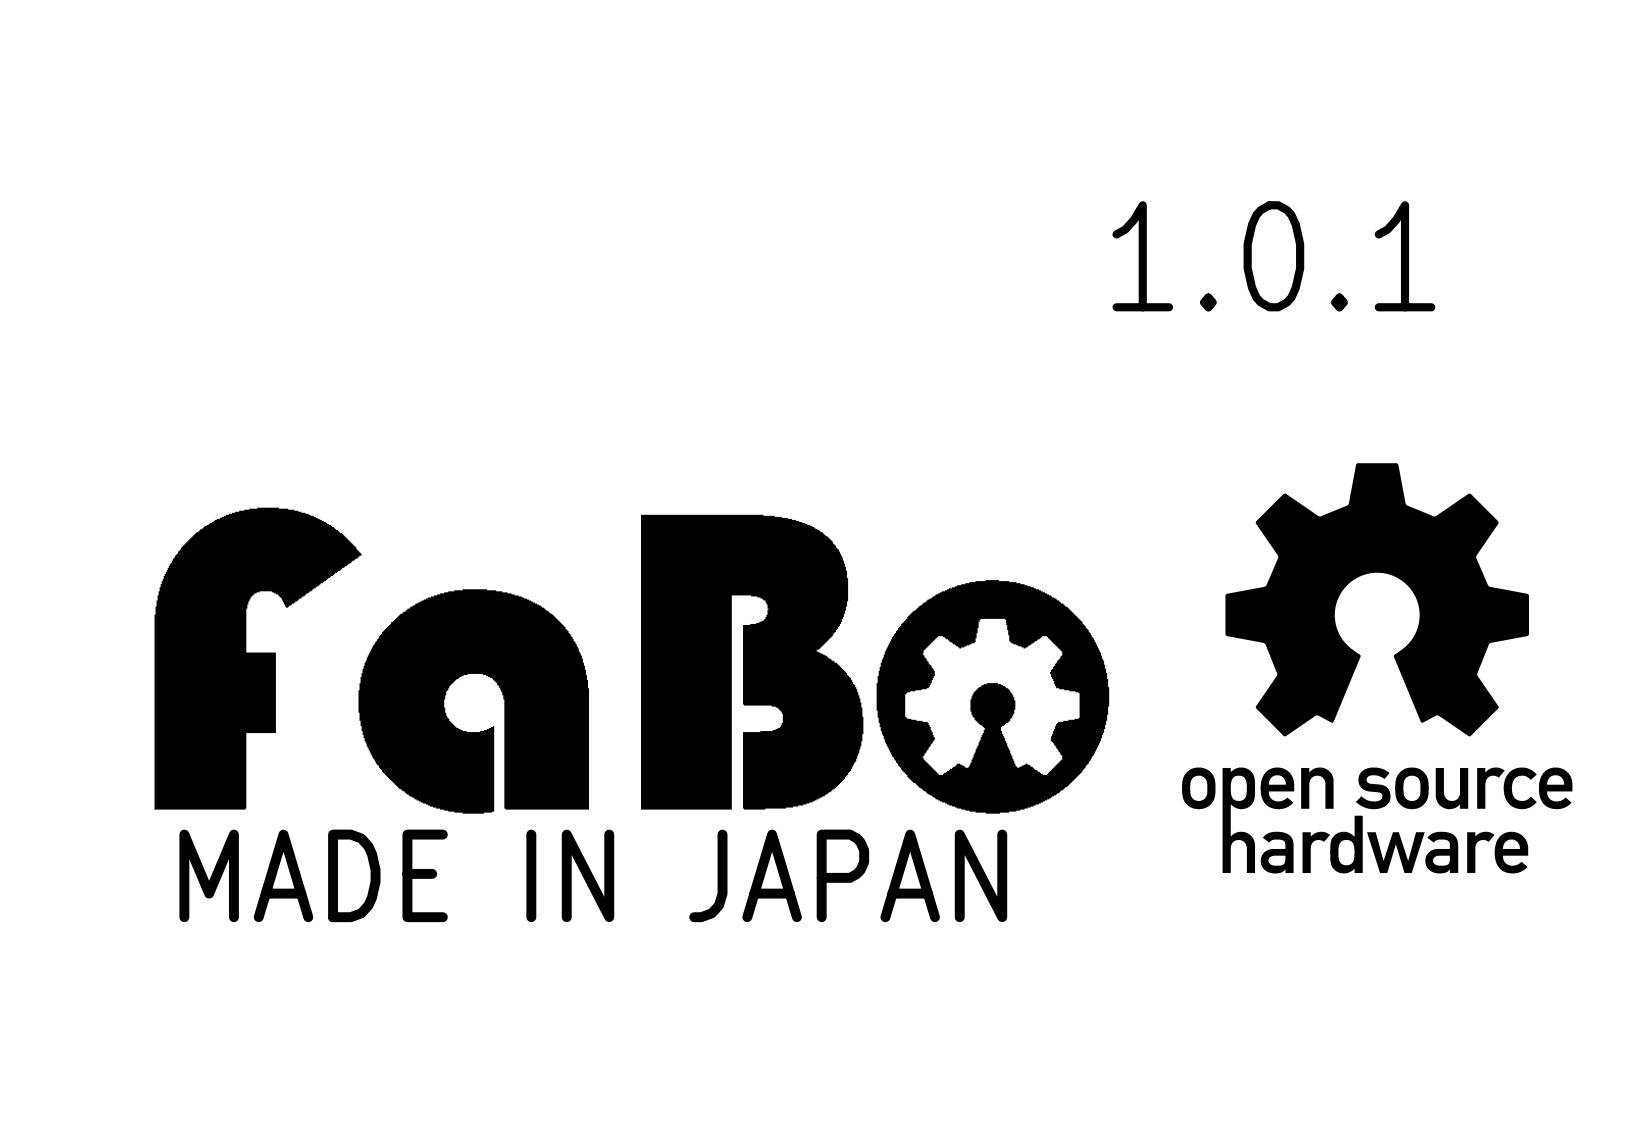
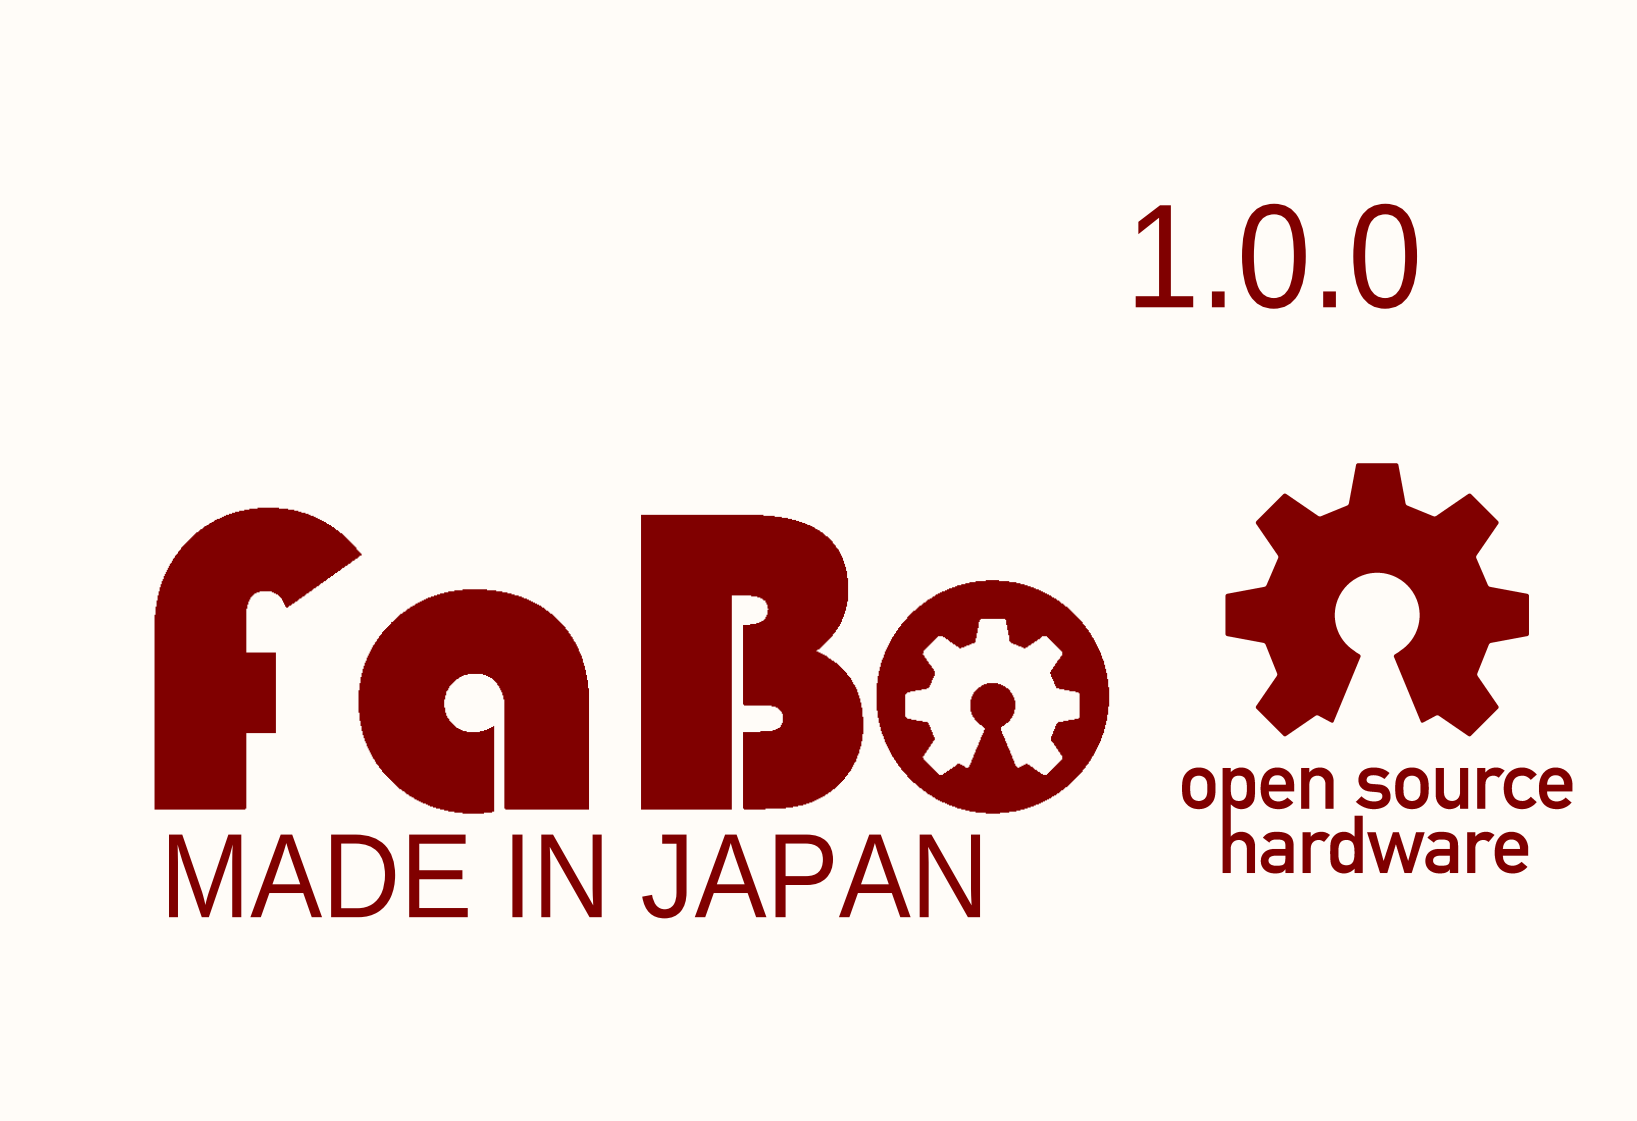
text: 1.0.1 (1273, 256) -> 1.0.0 (1276, 256)

